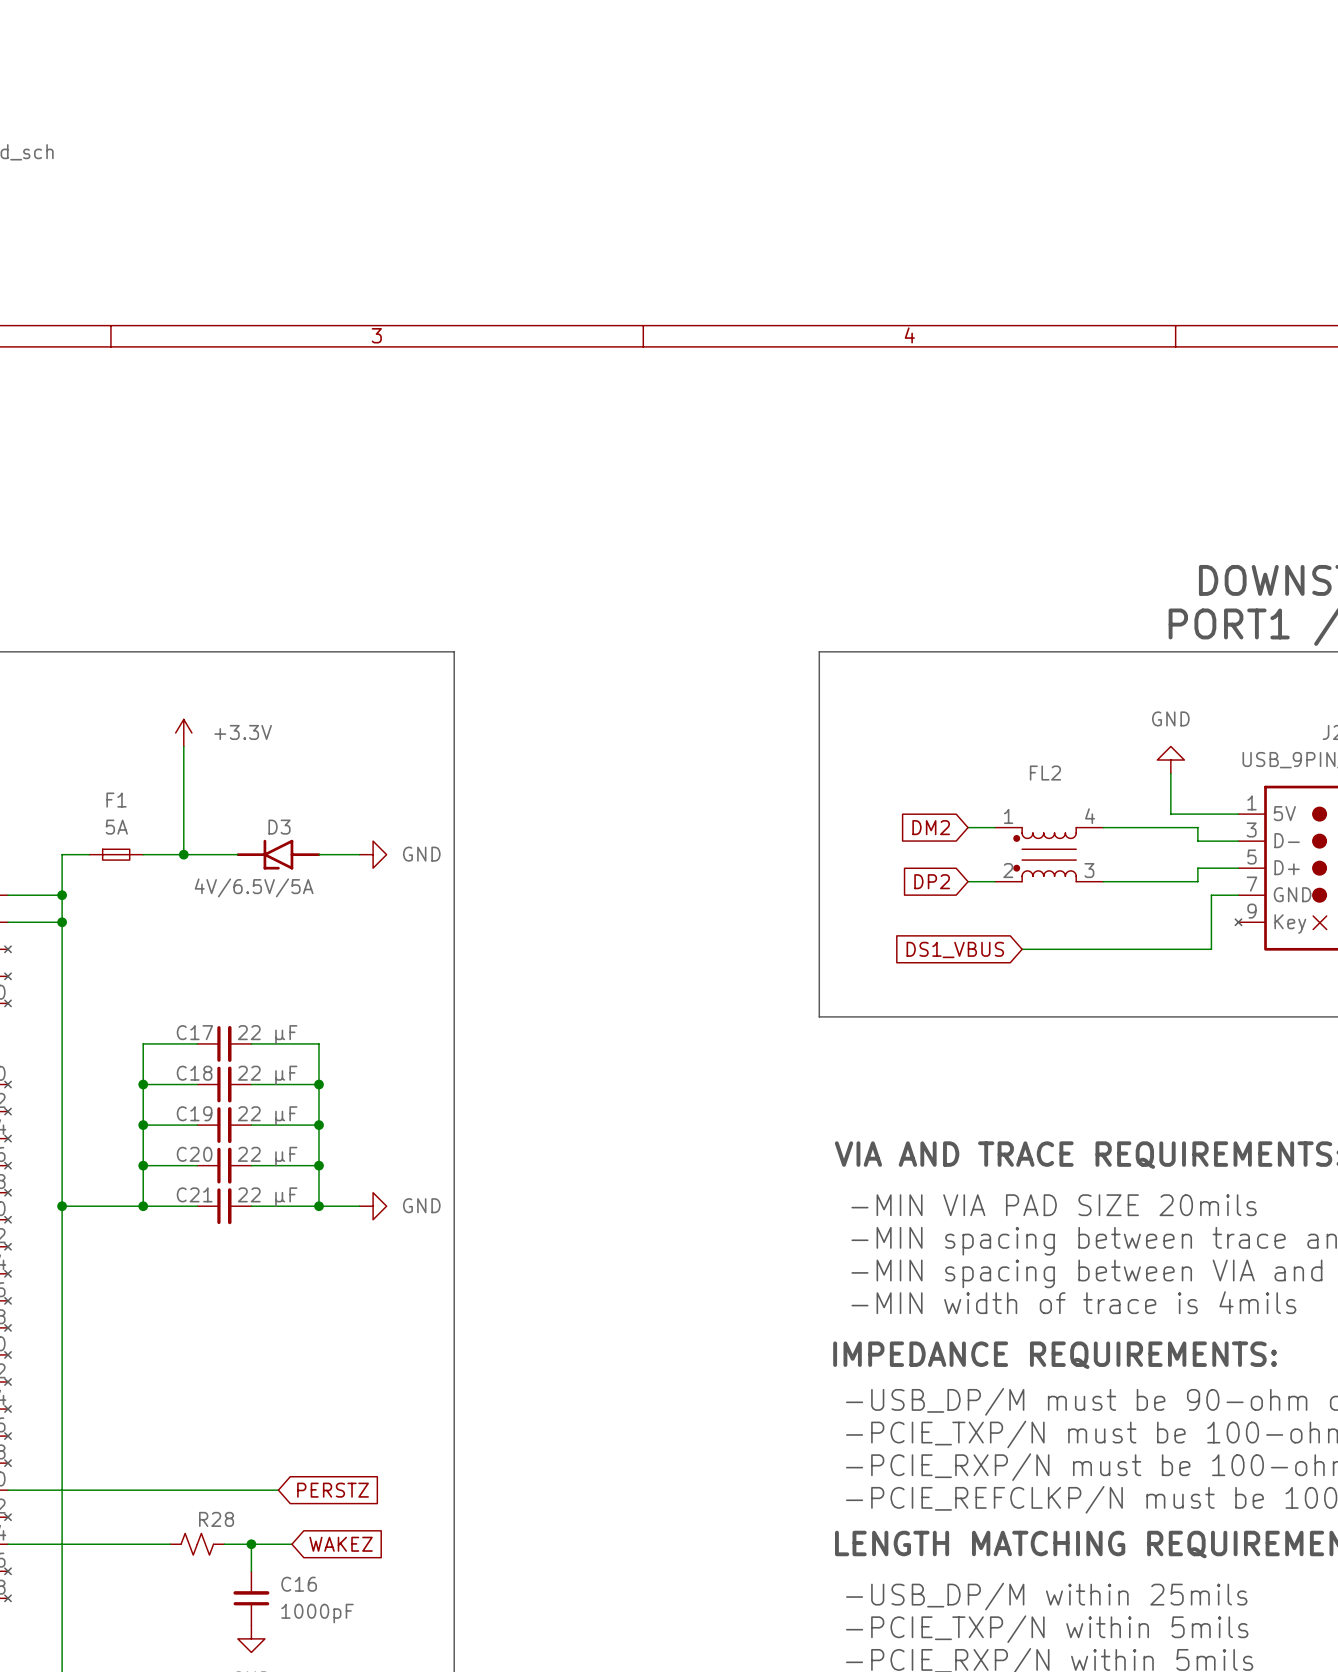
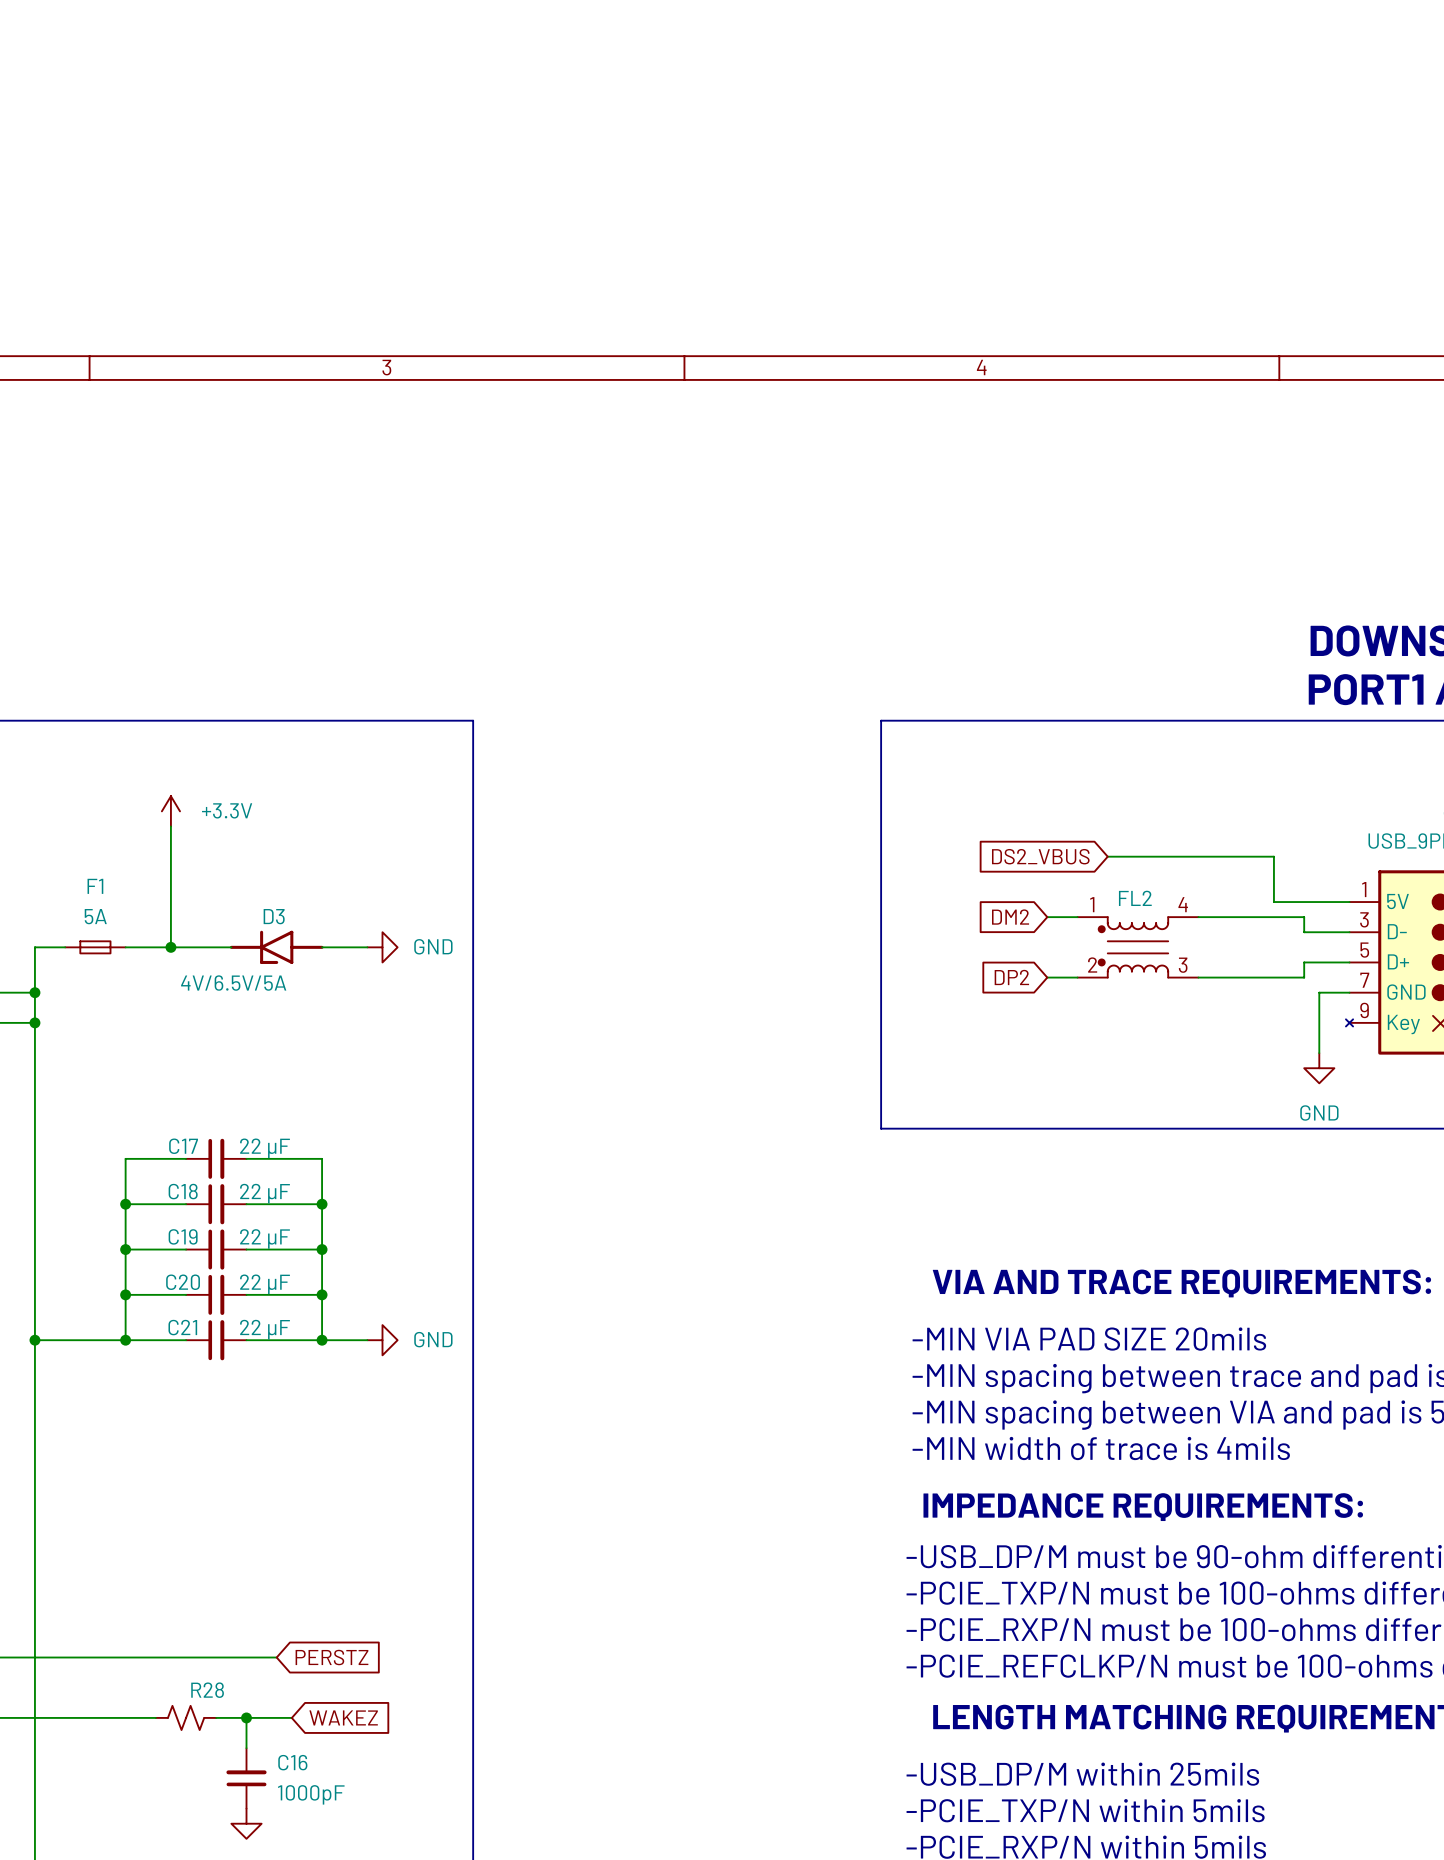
power symbol rotation: 0° (1170, 760) -> 180° (1319, 1068)
power symbol position: GND (1170, 760) -> GND (1319, 1068)
wire: none -> (1107, 856) (1273, 856)
FL2 name position: FL2 (1045, 773) -> FL2 (1135, 898)
global label: none -> DS2_VBUS (1040, 856)
global label: DS1_VBUS (955, 949) -> none
wire: (1022, 949) (1211, 949) -> none

